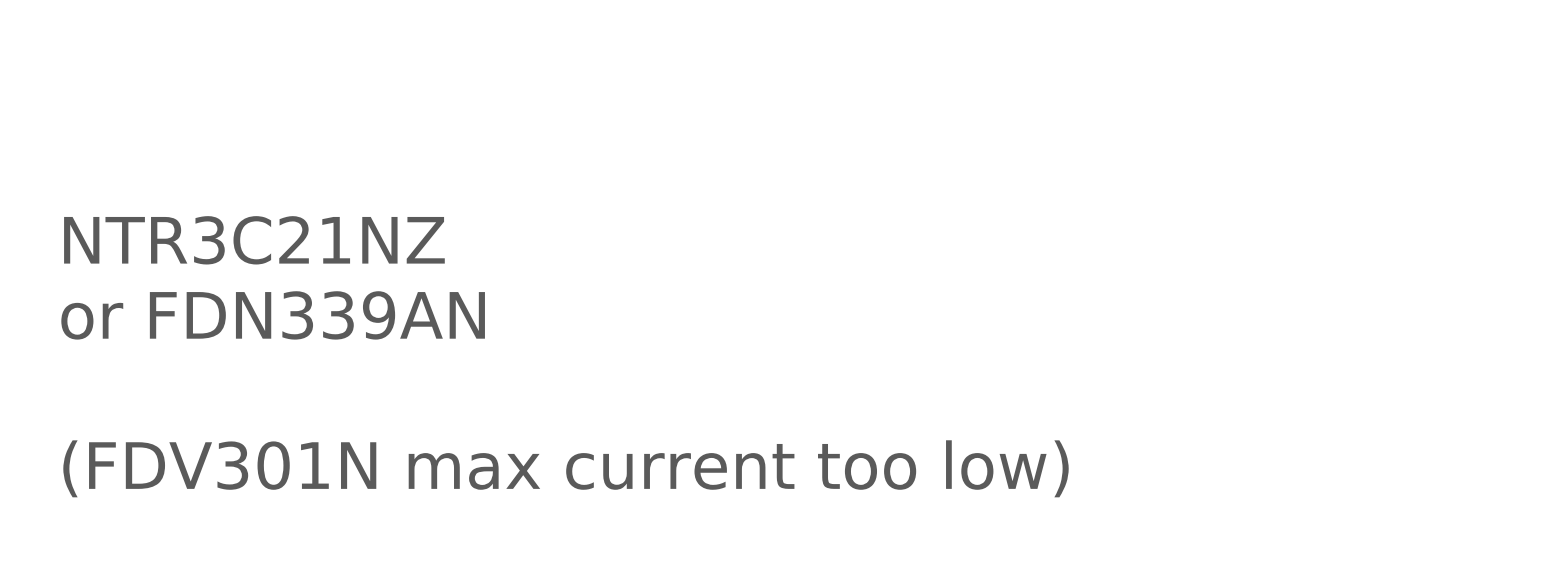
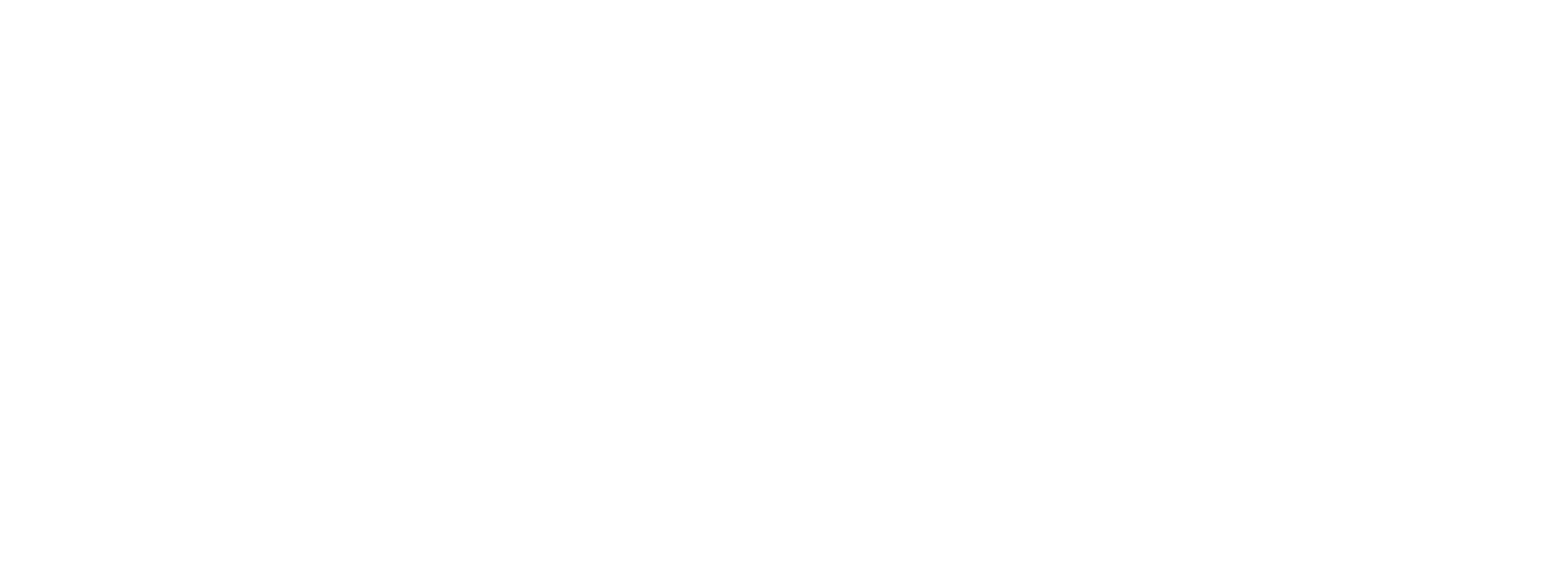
text: NTR3C21NZ (254, 240) -> none
text: or FDN339AN (273, 315) -> none
text: (FDV301N max current too low) (566, 468) -> none

